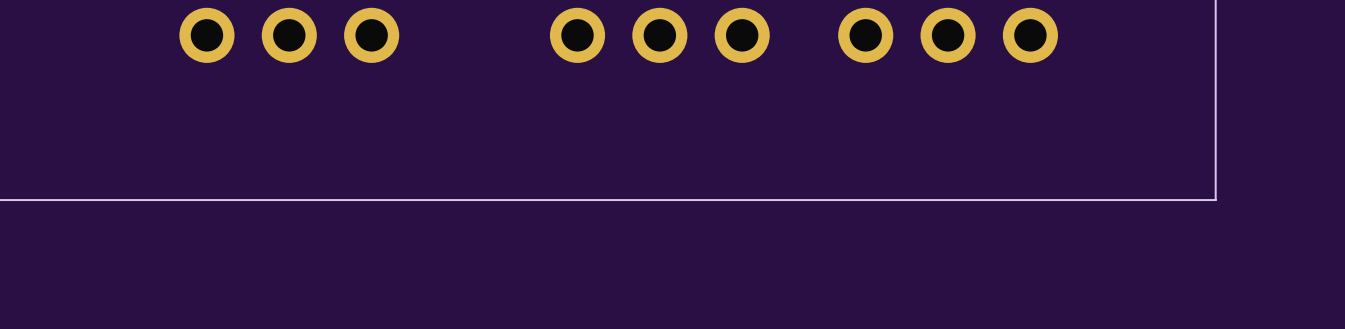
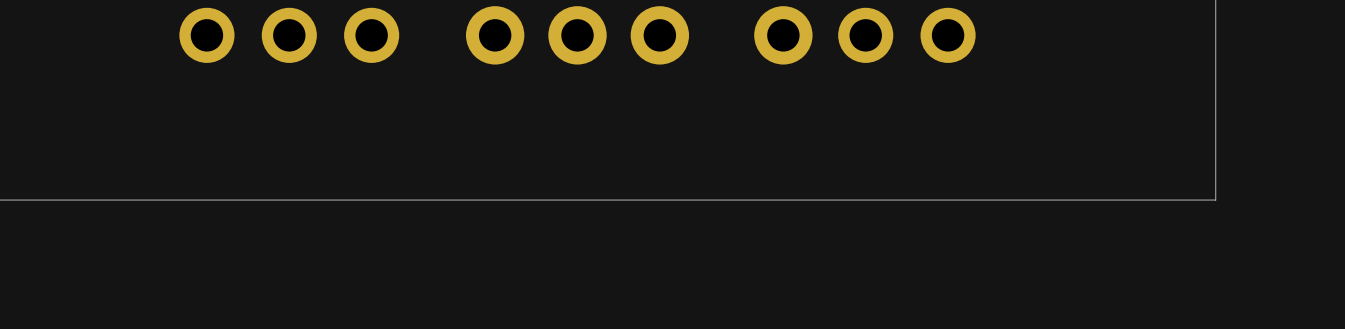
part: none -> (577, 35)
part: (659, 35) -> none
part: none -> (783, 35)
part: (1030, 35) -> none

